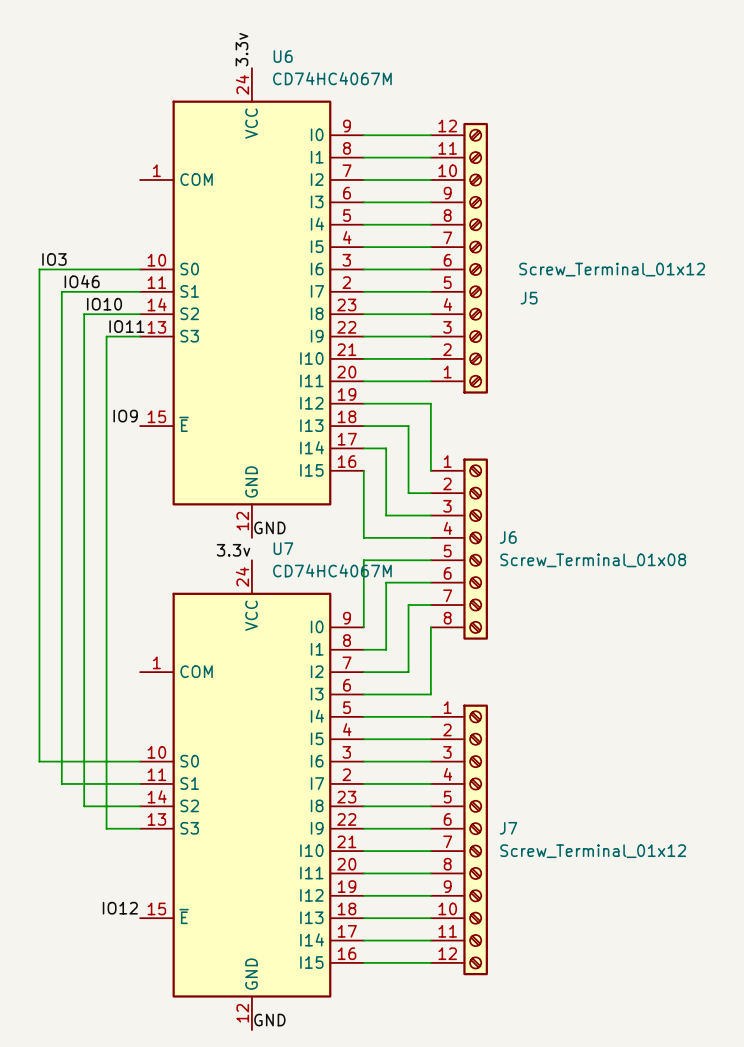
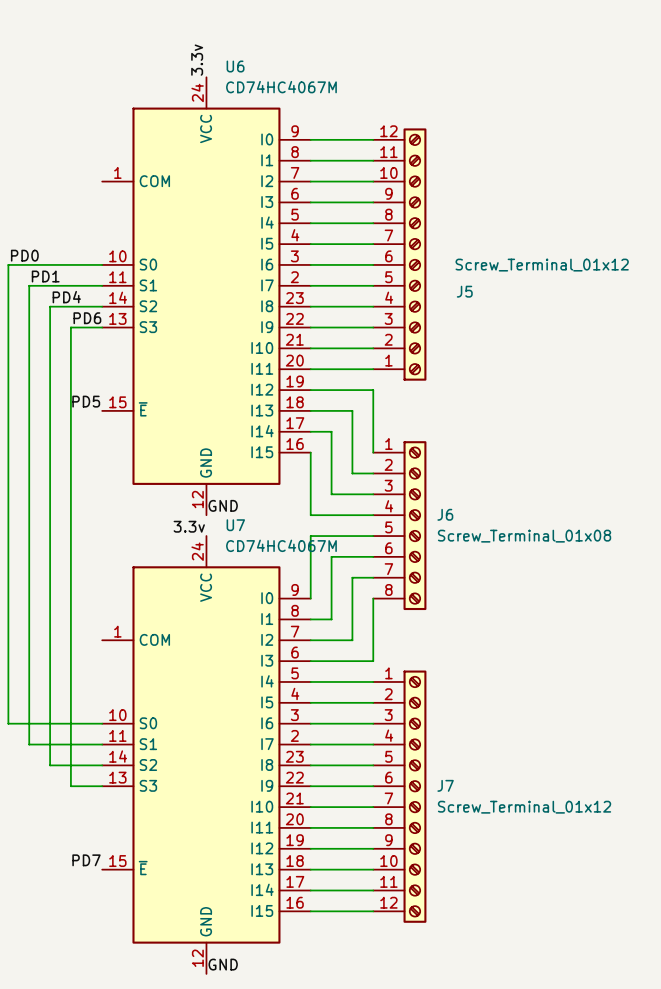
label: IO3 (54, 259) -> PD0 (24, 255)
label: IO46 (82, 281) -> PD1 (45, 276)
label: IO10 (104, 304) -> PD4 (66, 297)
label: IO11 (126, 326) -> PD6 (87, 318)
label: IO9 (125, 416) -> PD5 (86, 401)
label: IO12 (120, 908) -> PD7 (86, 860)

